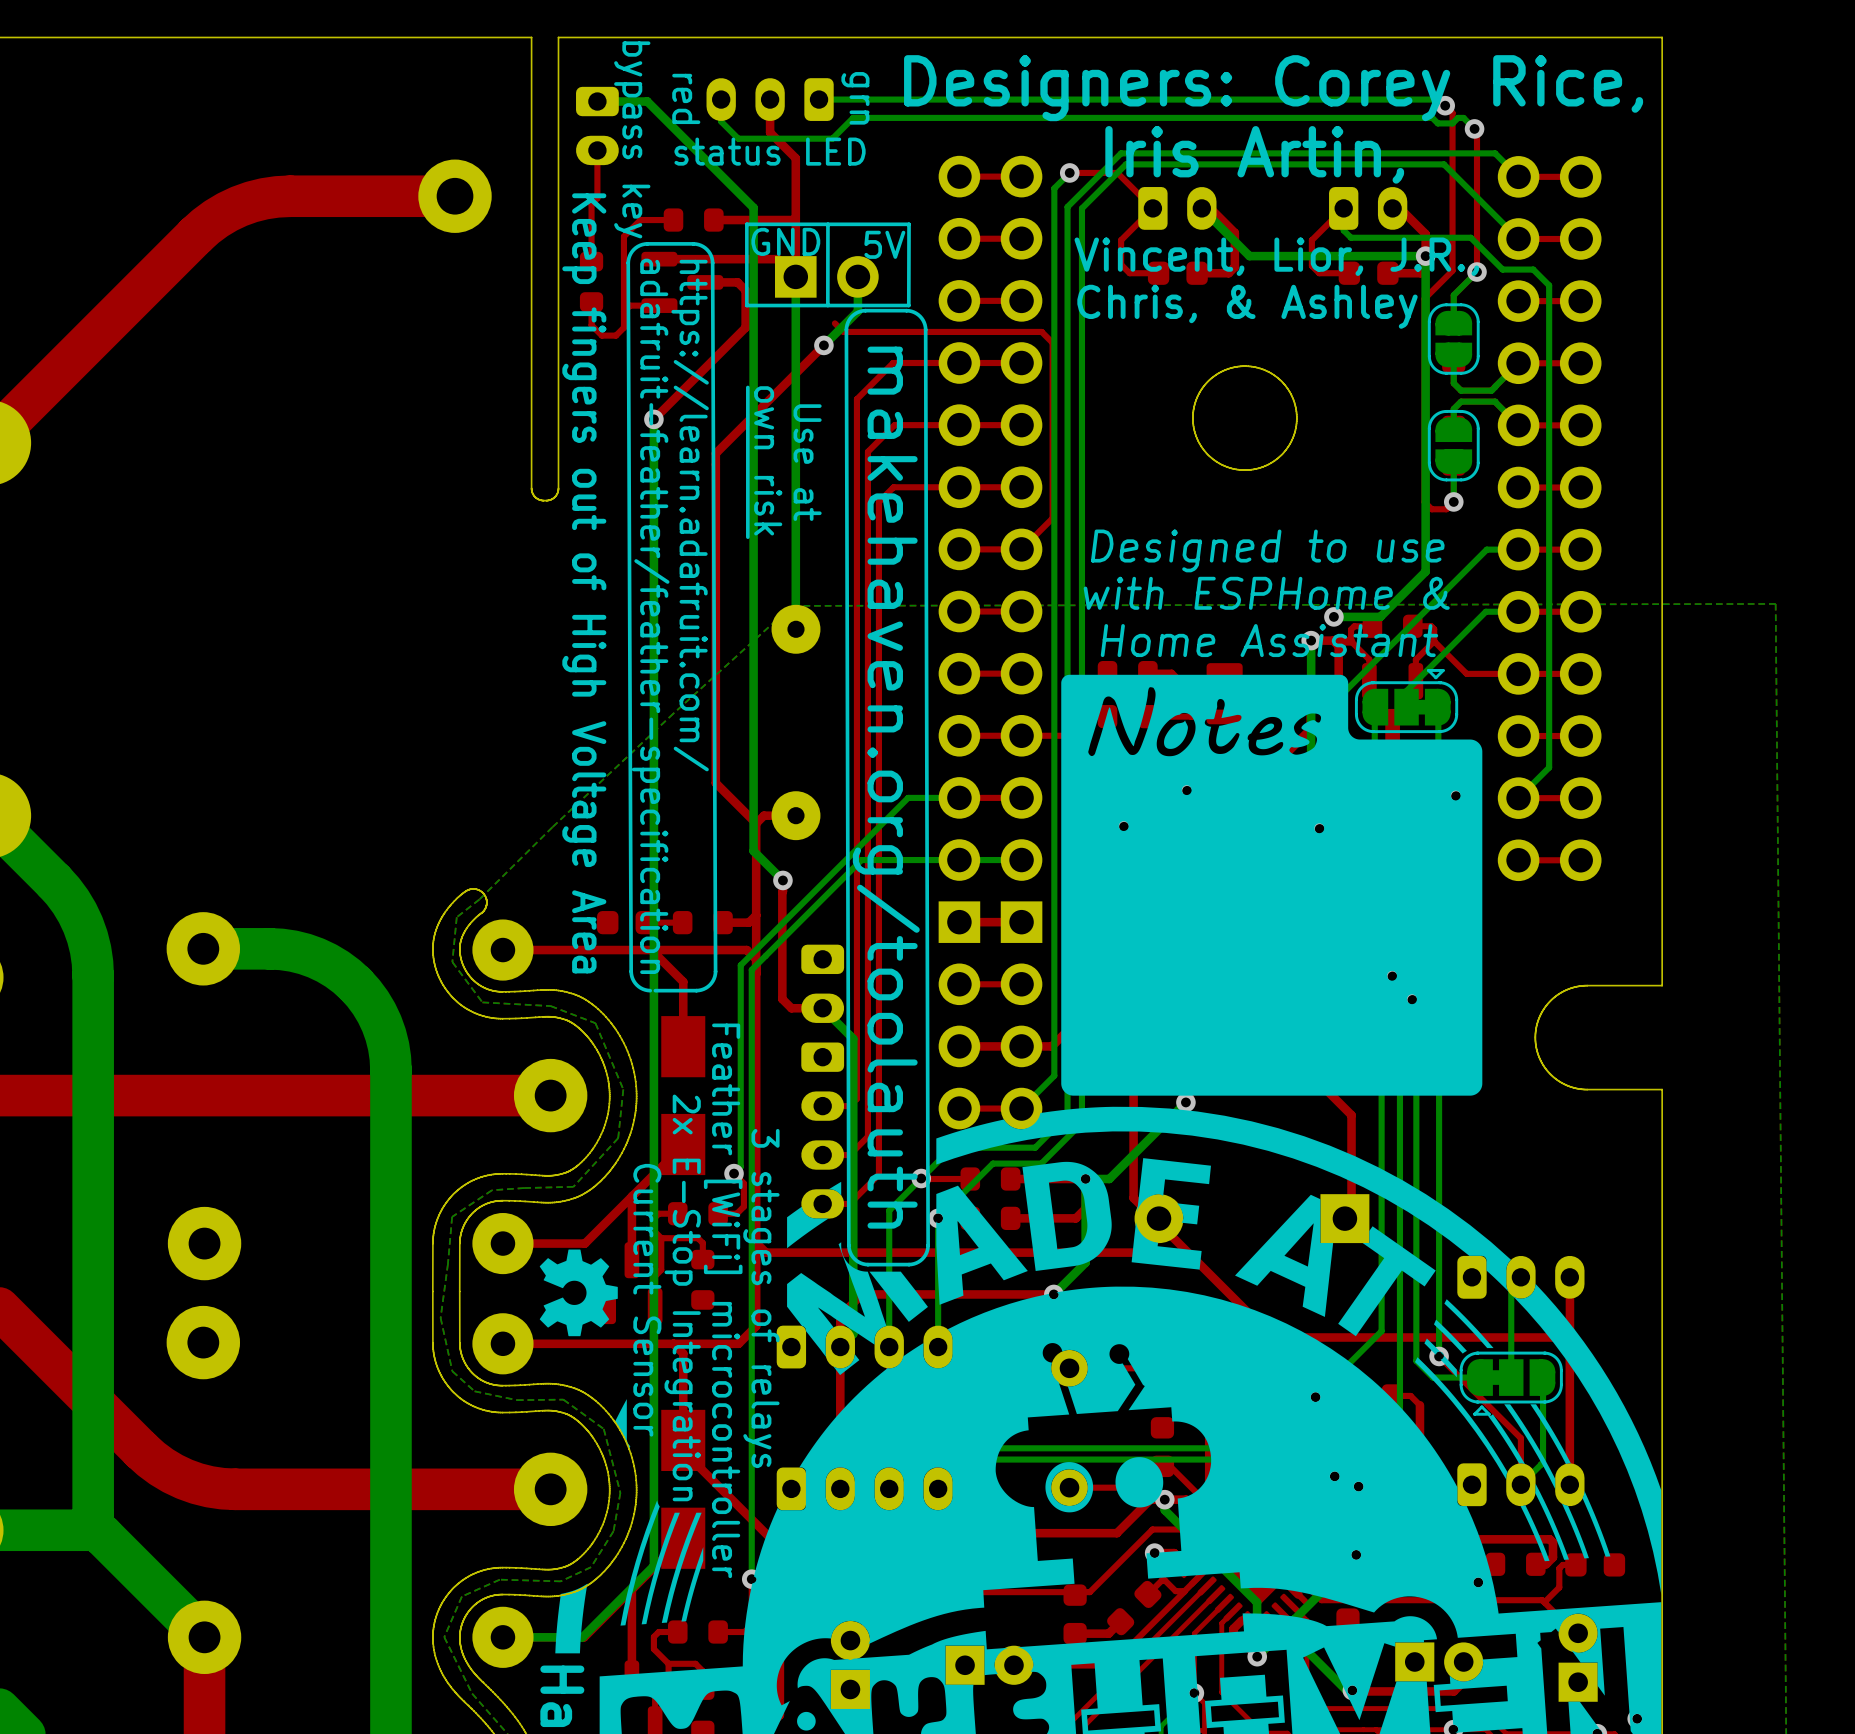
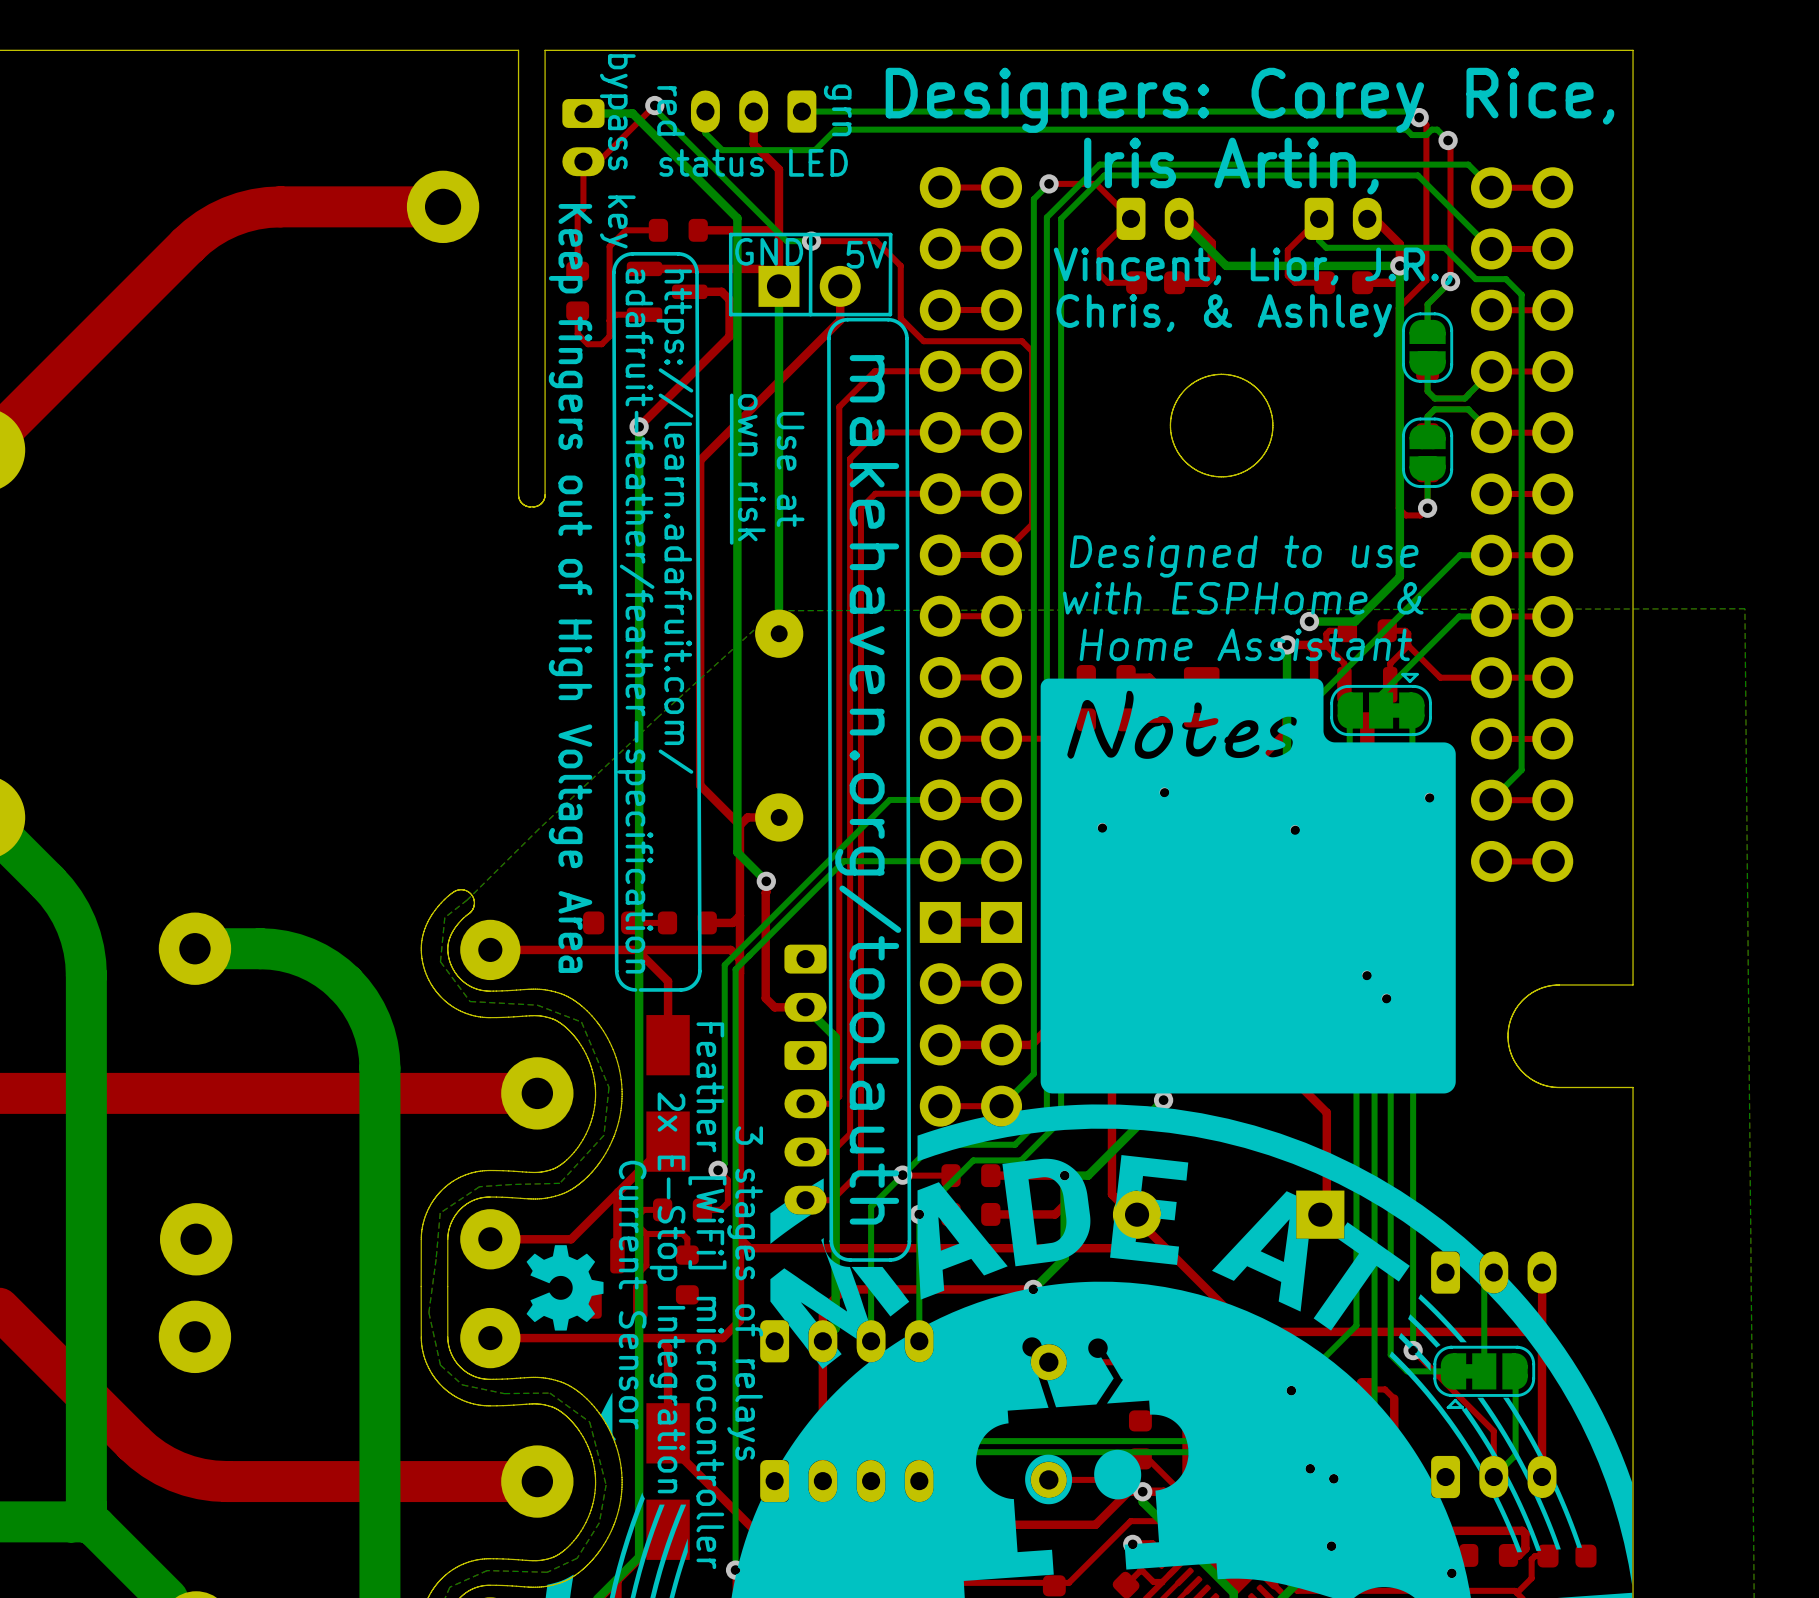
top track: none -> (654, 105) (598, 161) (583, 161)
bottom track: none -> (654, 105) (654, 109) (786, 241) (811, 241)
via: none -> (654, 105)
top track: none -> (840, 286) (840, 320) (806, 353)
bottom track: (857, 276) (857, 311) (823, 345) -> none
top track: (834, 323) (843, 331) (1042, 332) -> (811, 241) (876, 241) (900, 265) (900, 318) (923, 341) (1022, 341)
via position: (823, 345) -> (811, 241)

